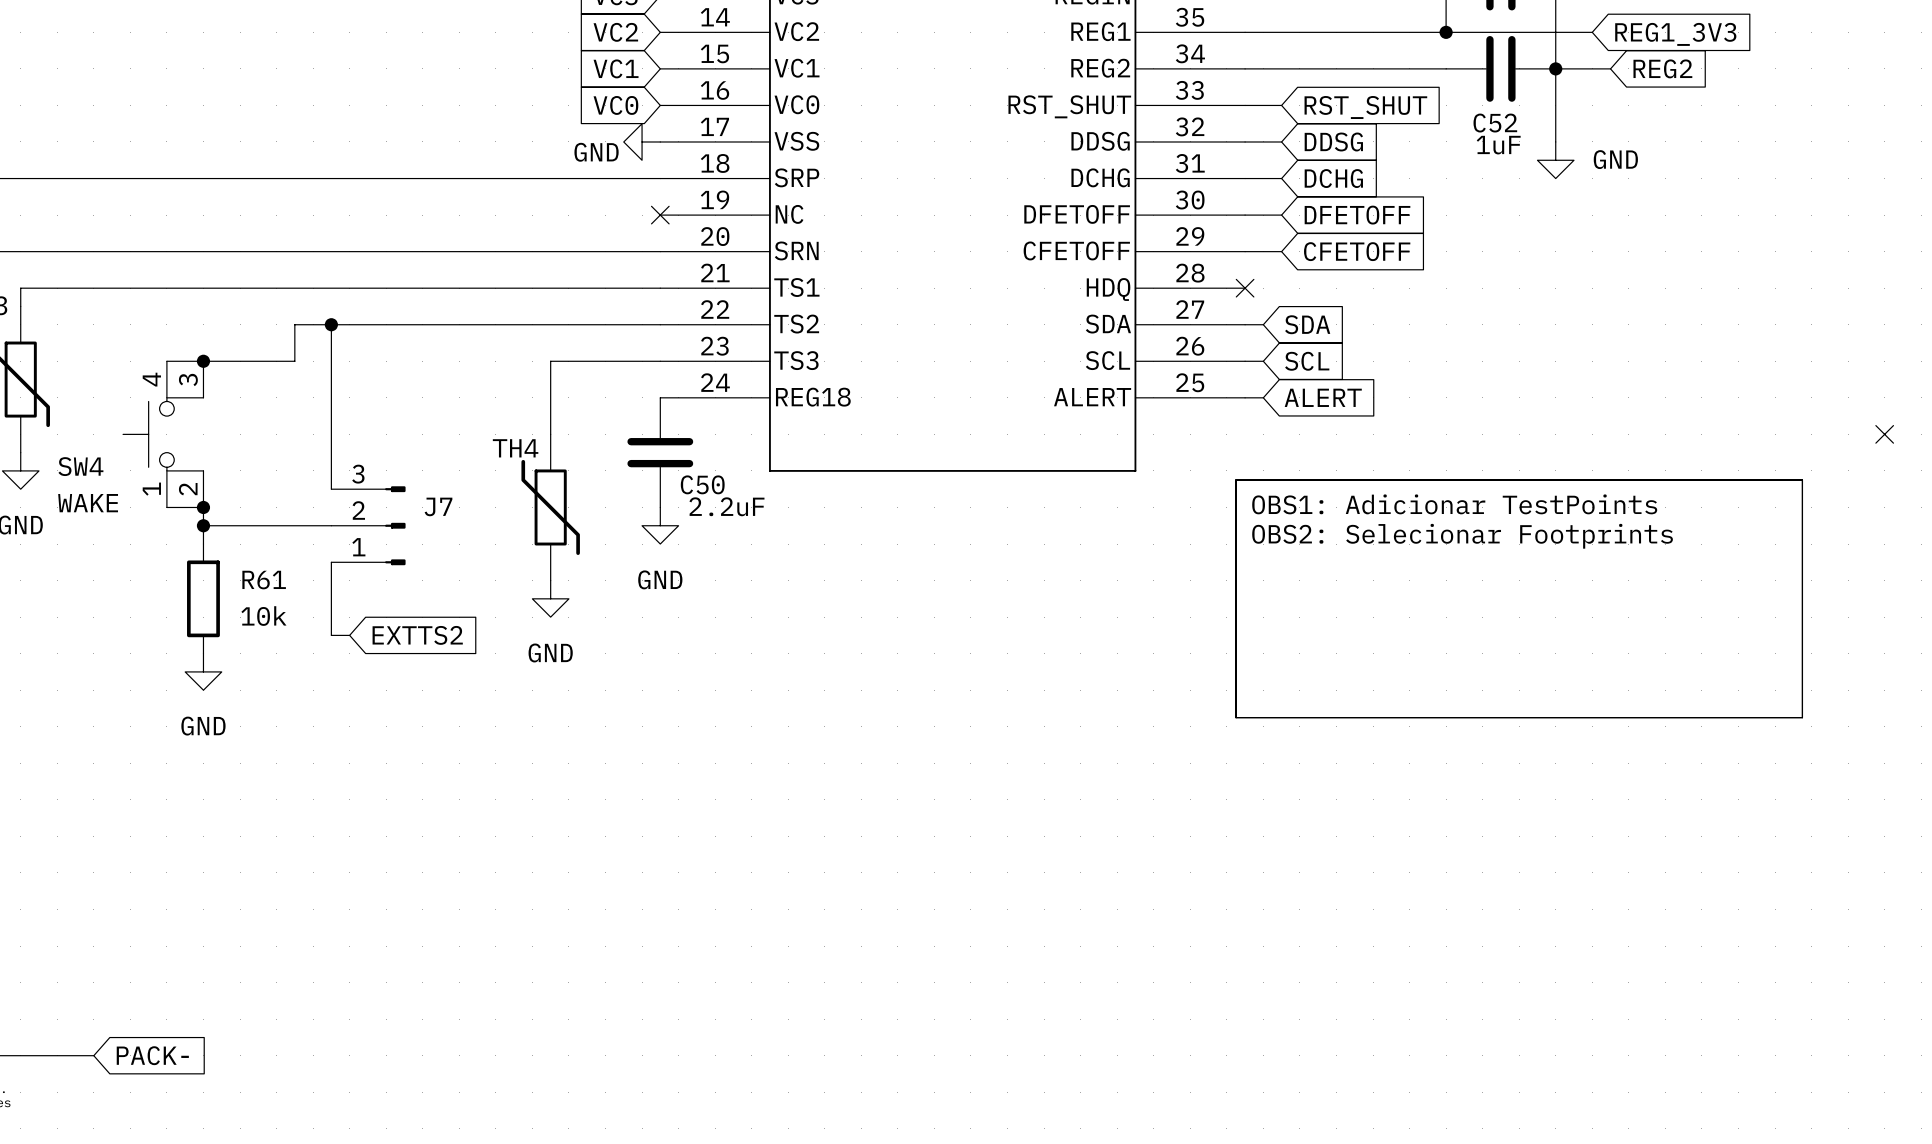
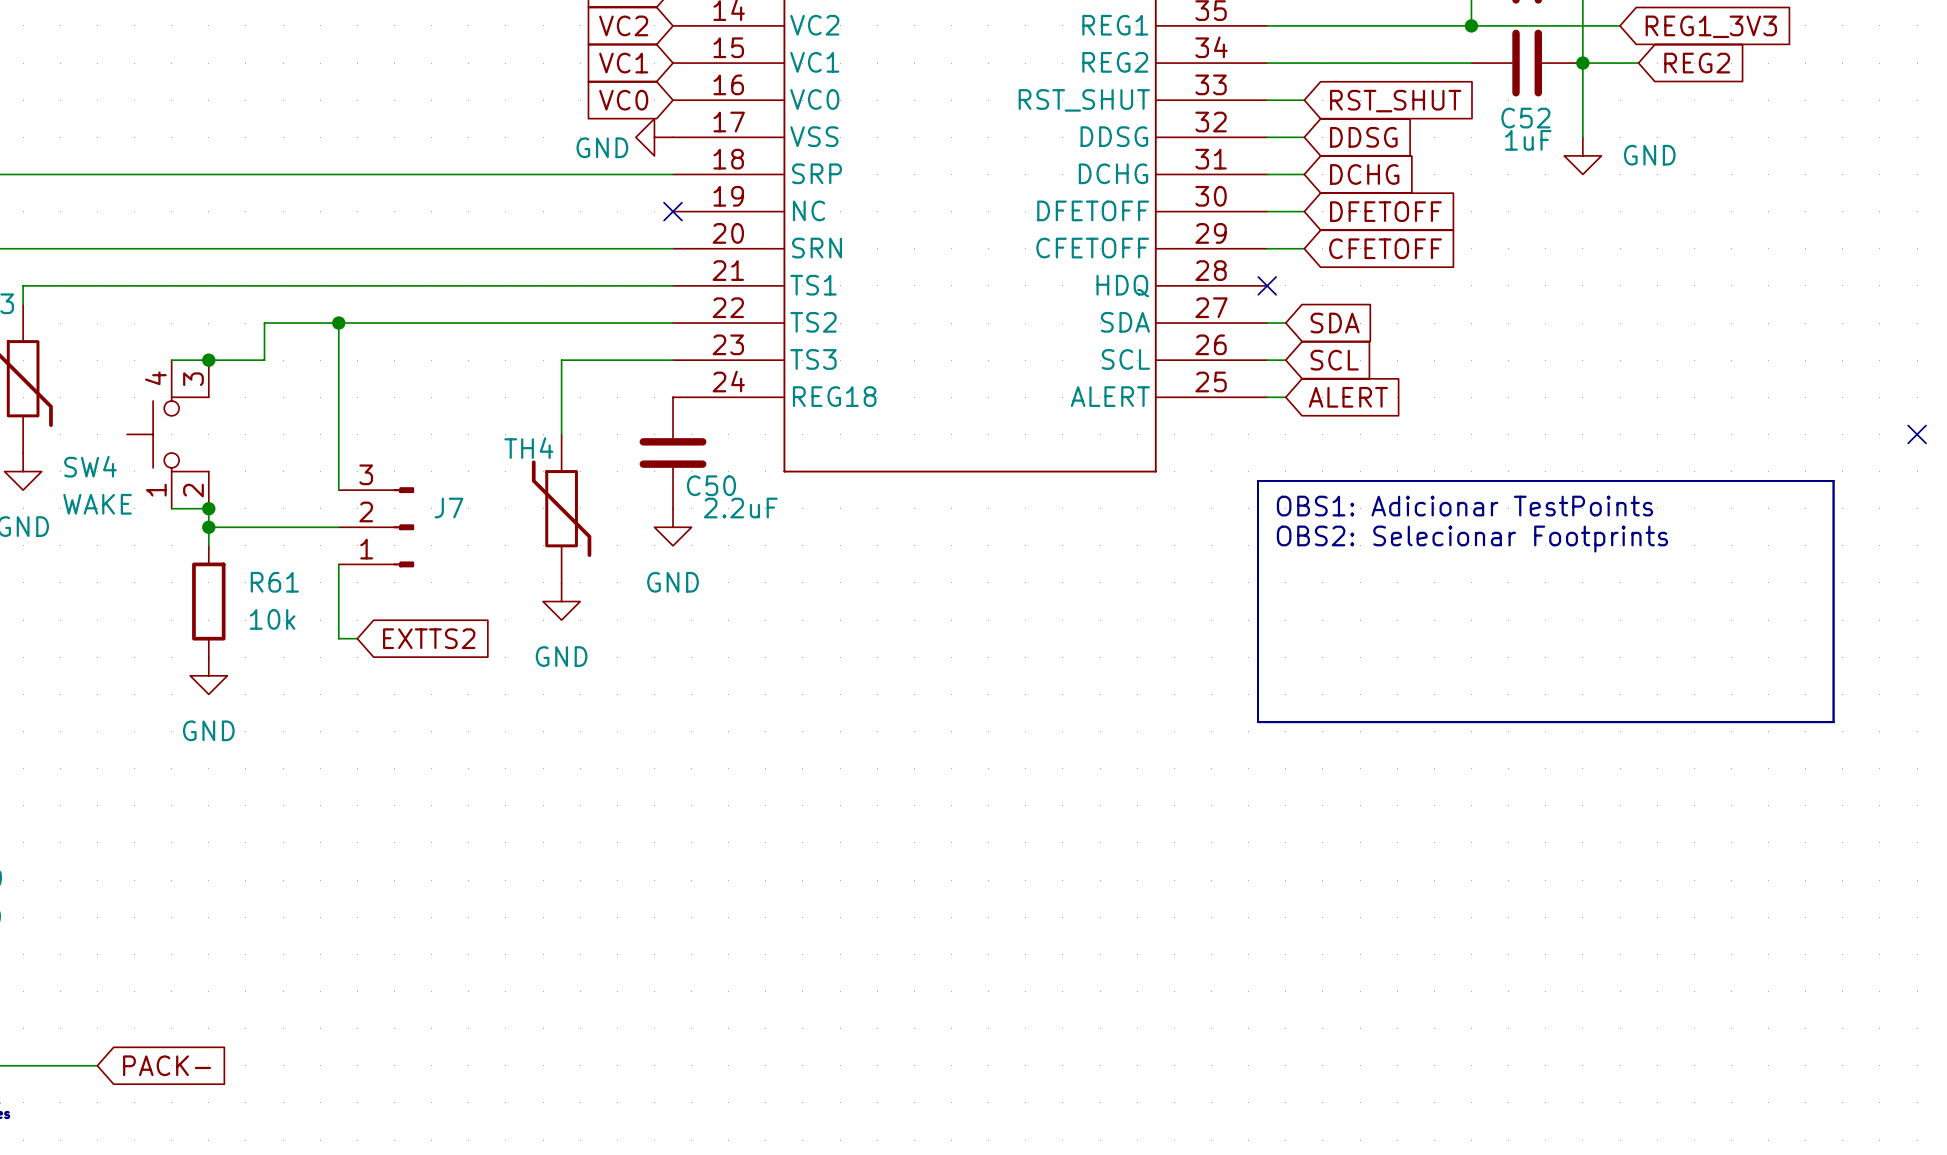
wire: (294, 324) (294, 361) (258, 361) -> (301, 323) (264, 323) (264, 360)

